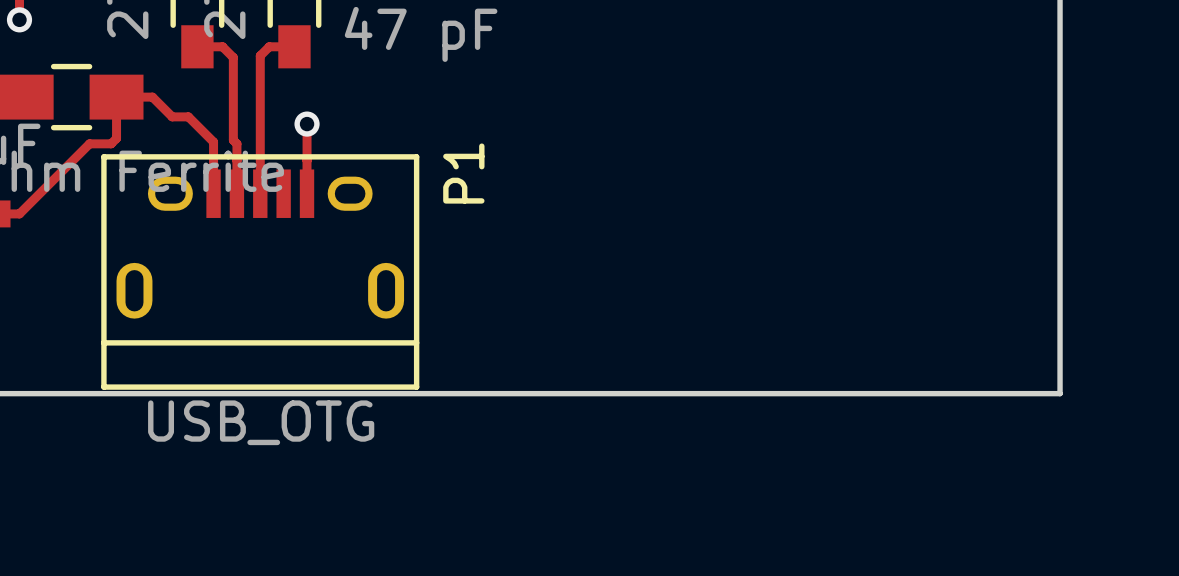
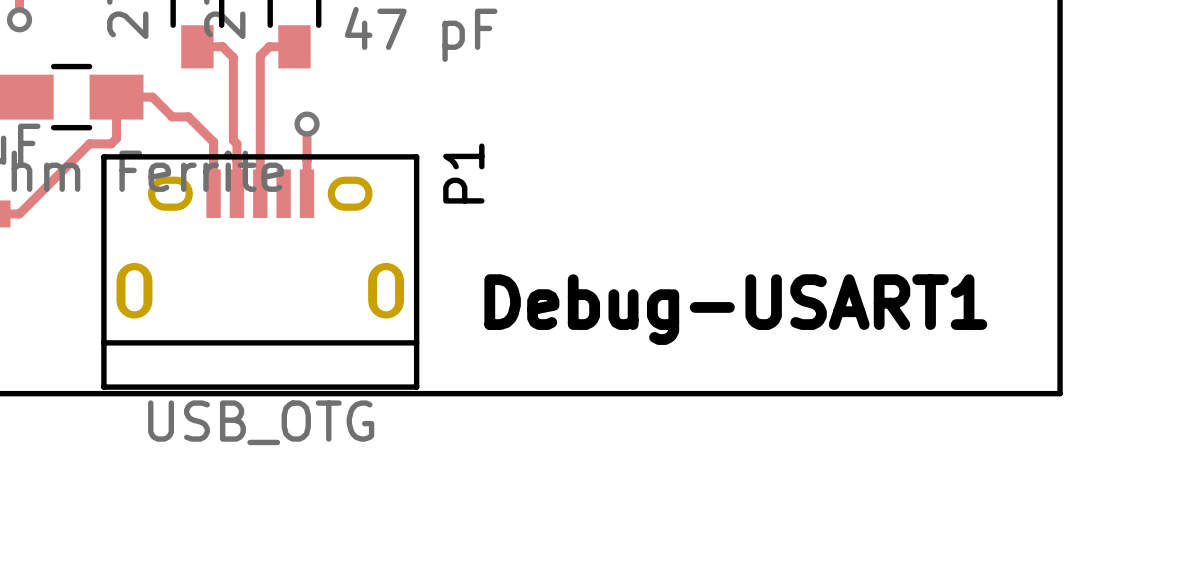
text: none -> Debug-USART1 (735, 309)

